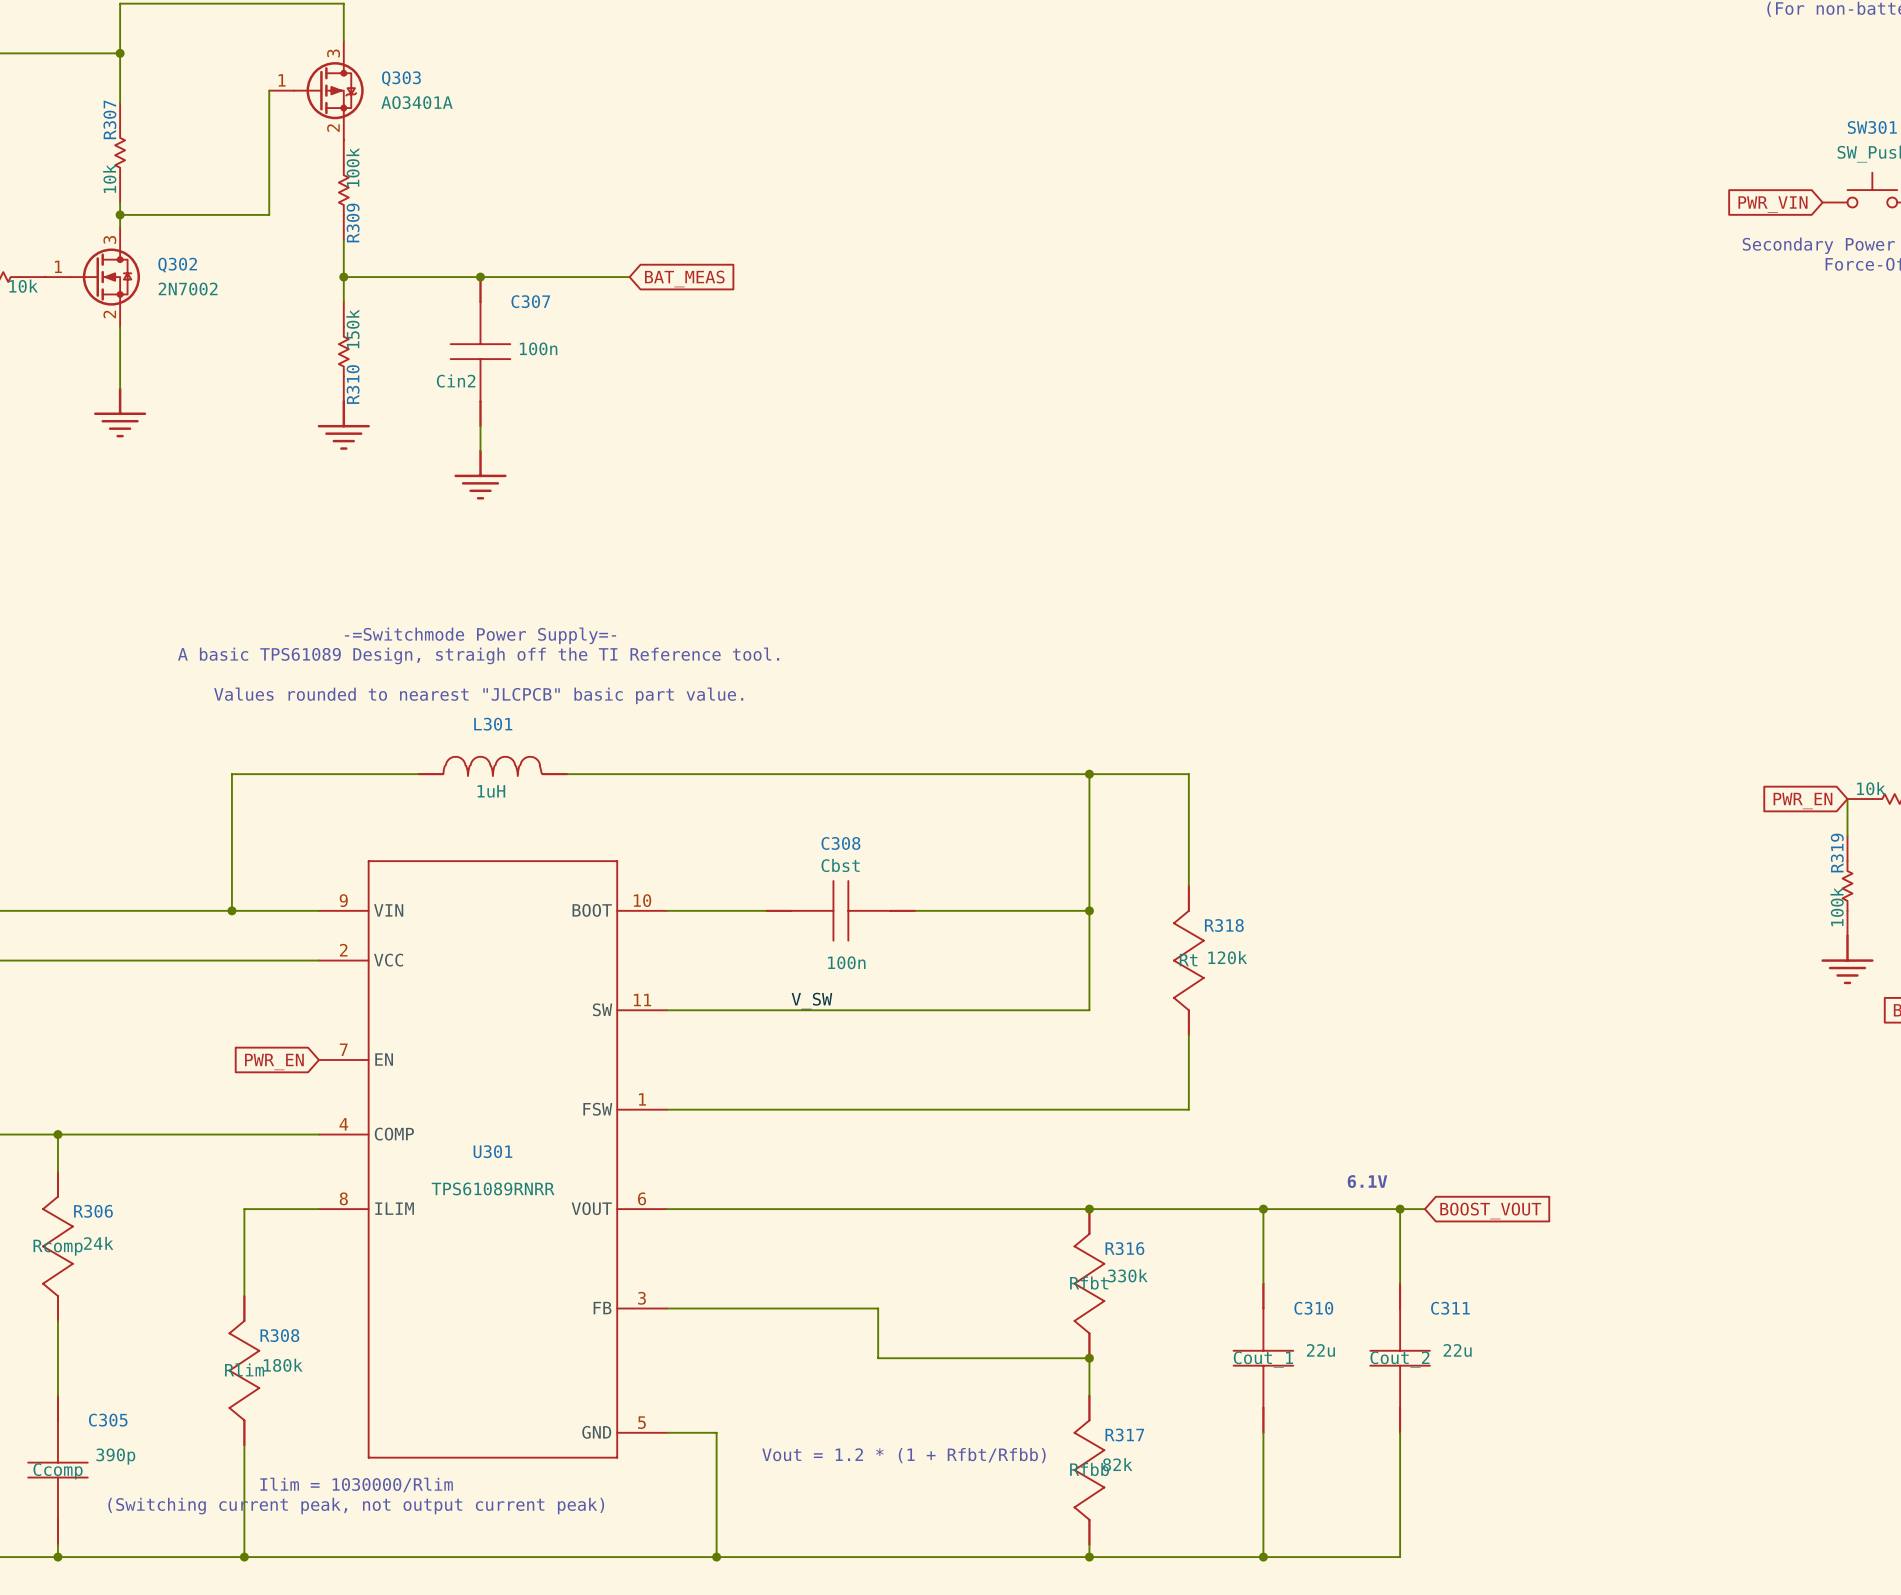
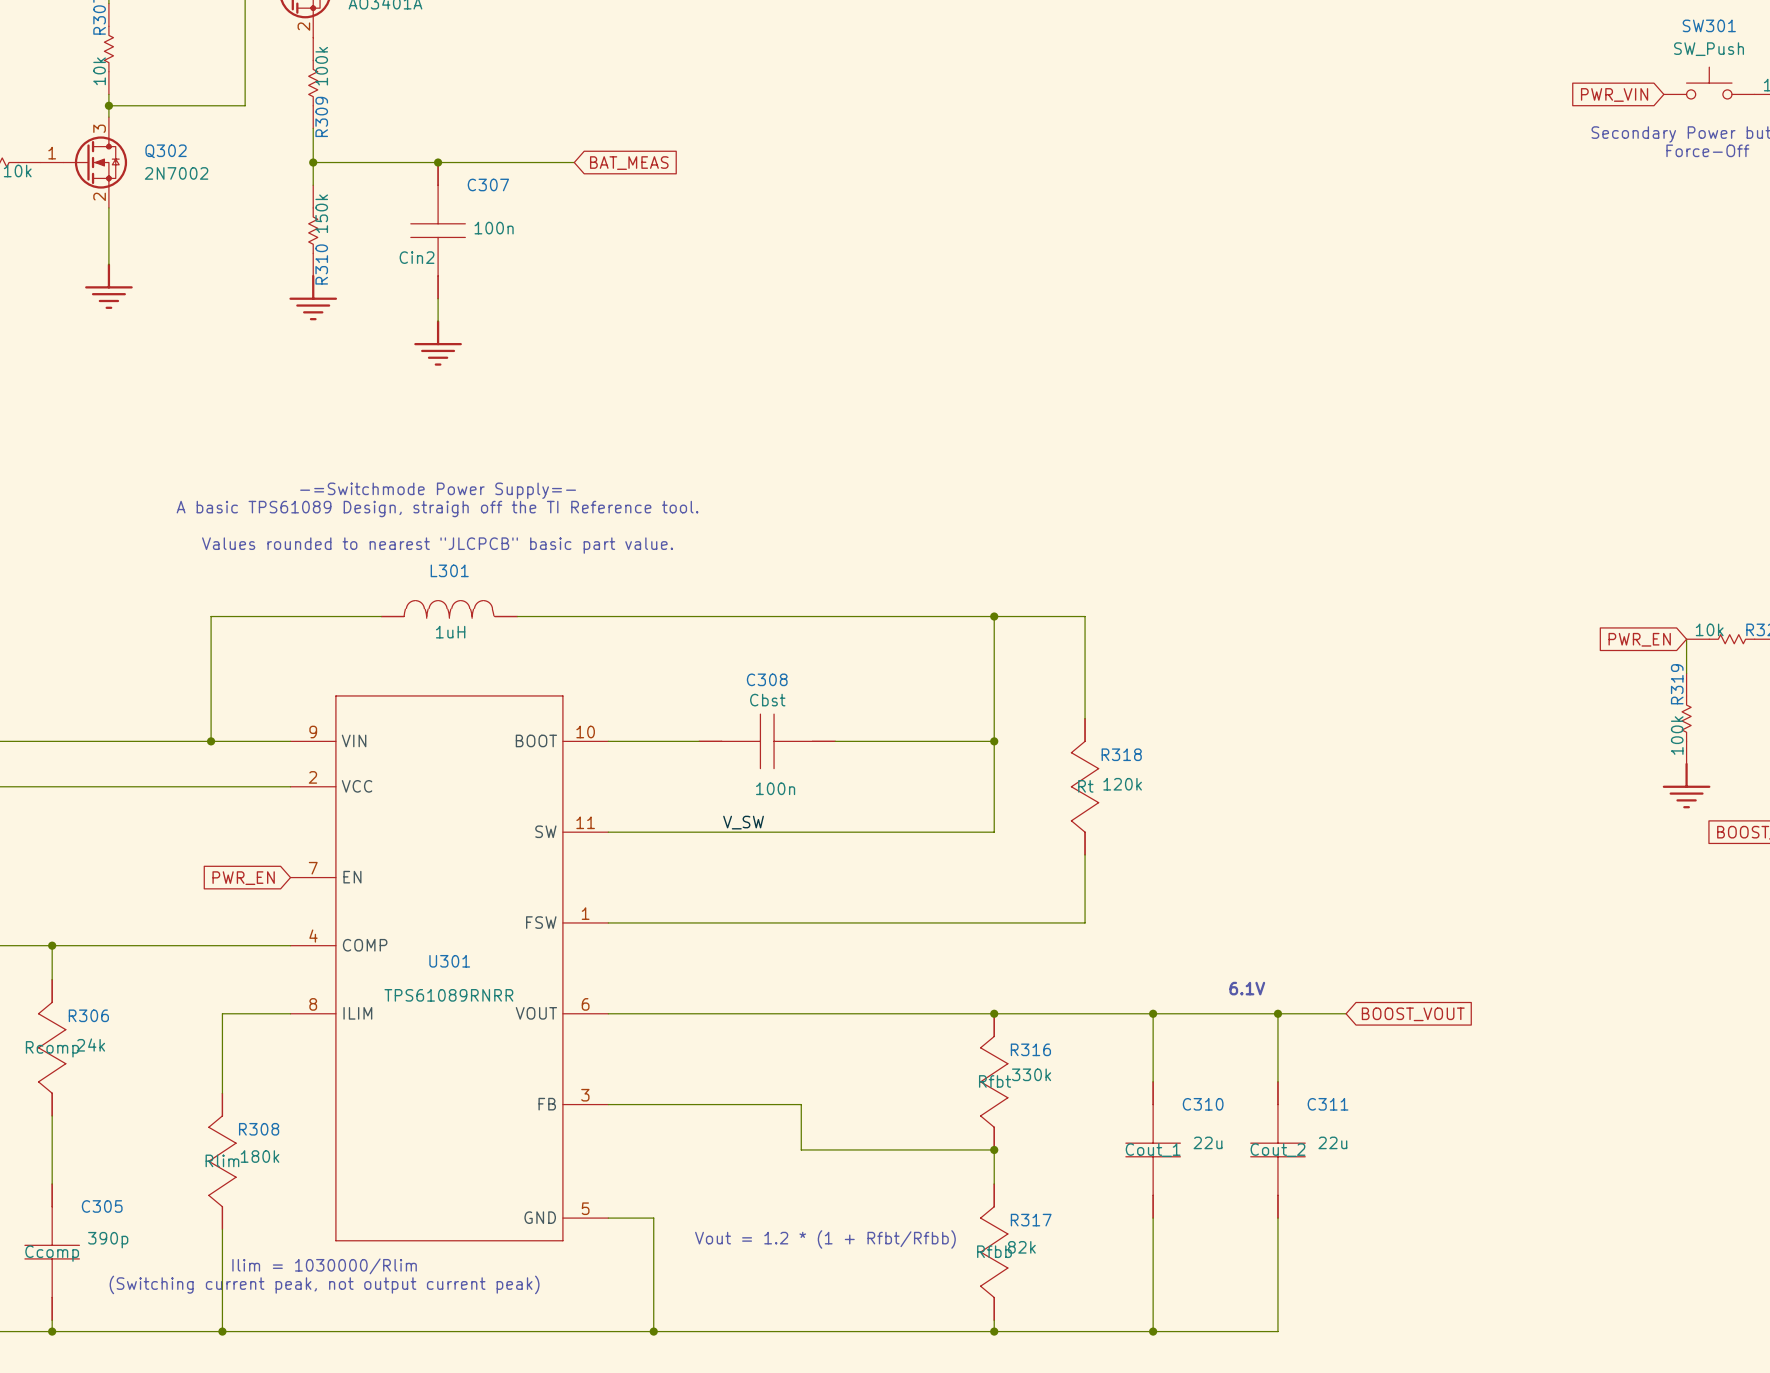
wire: none -> (1300, 1013) (1346, 1013)
global label position: BOOST_VOUT (1490, 1211) -> BOOST_VOUT (1413, 1014)

